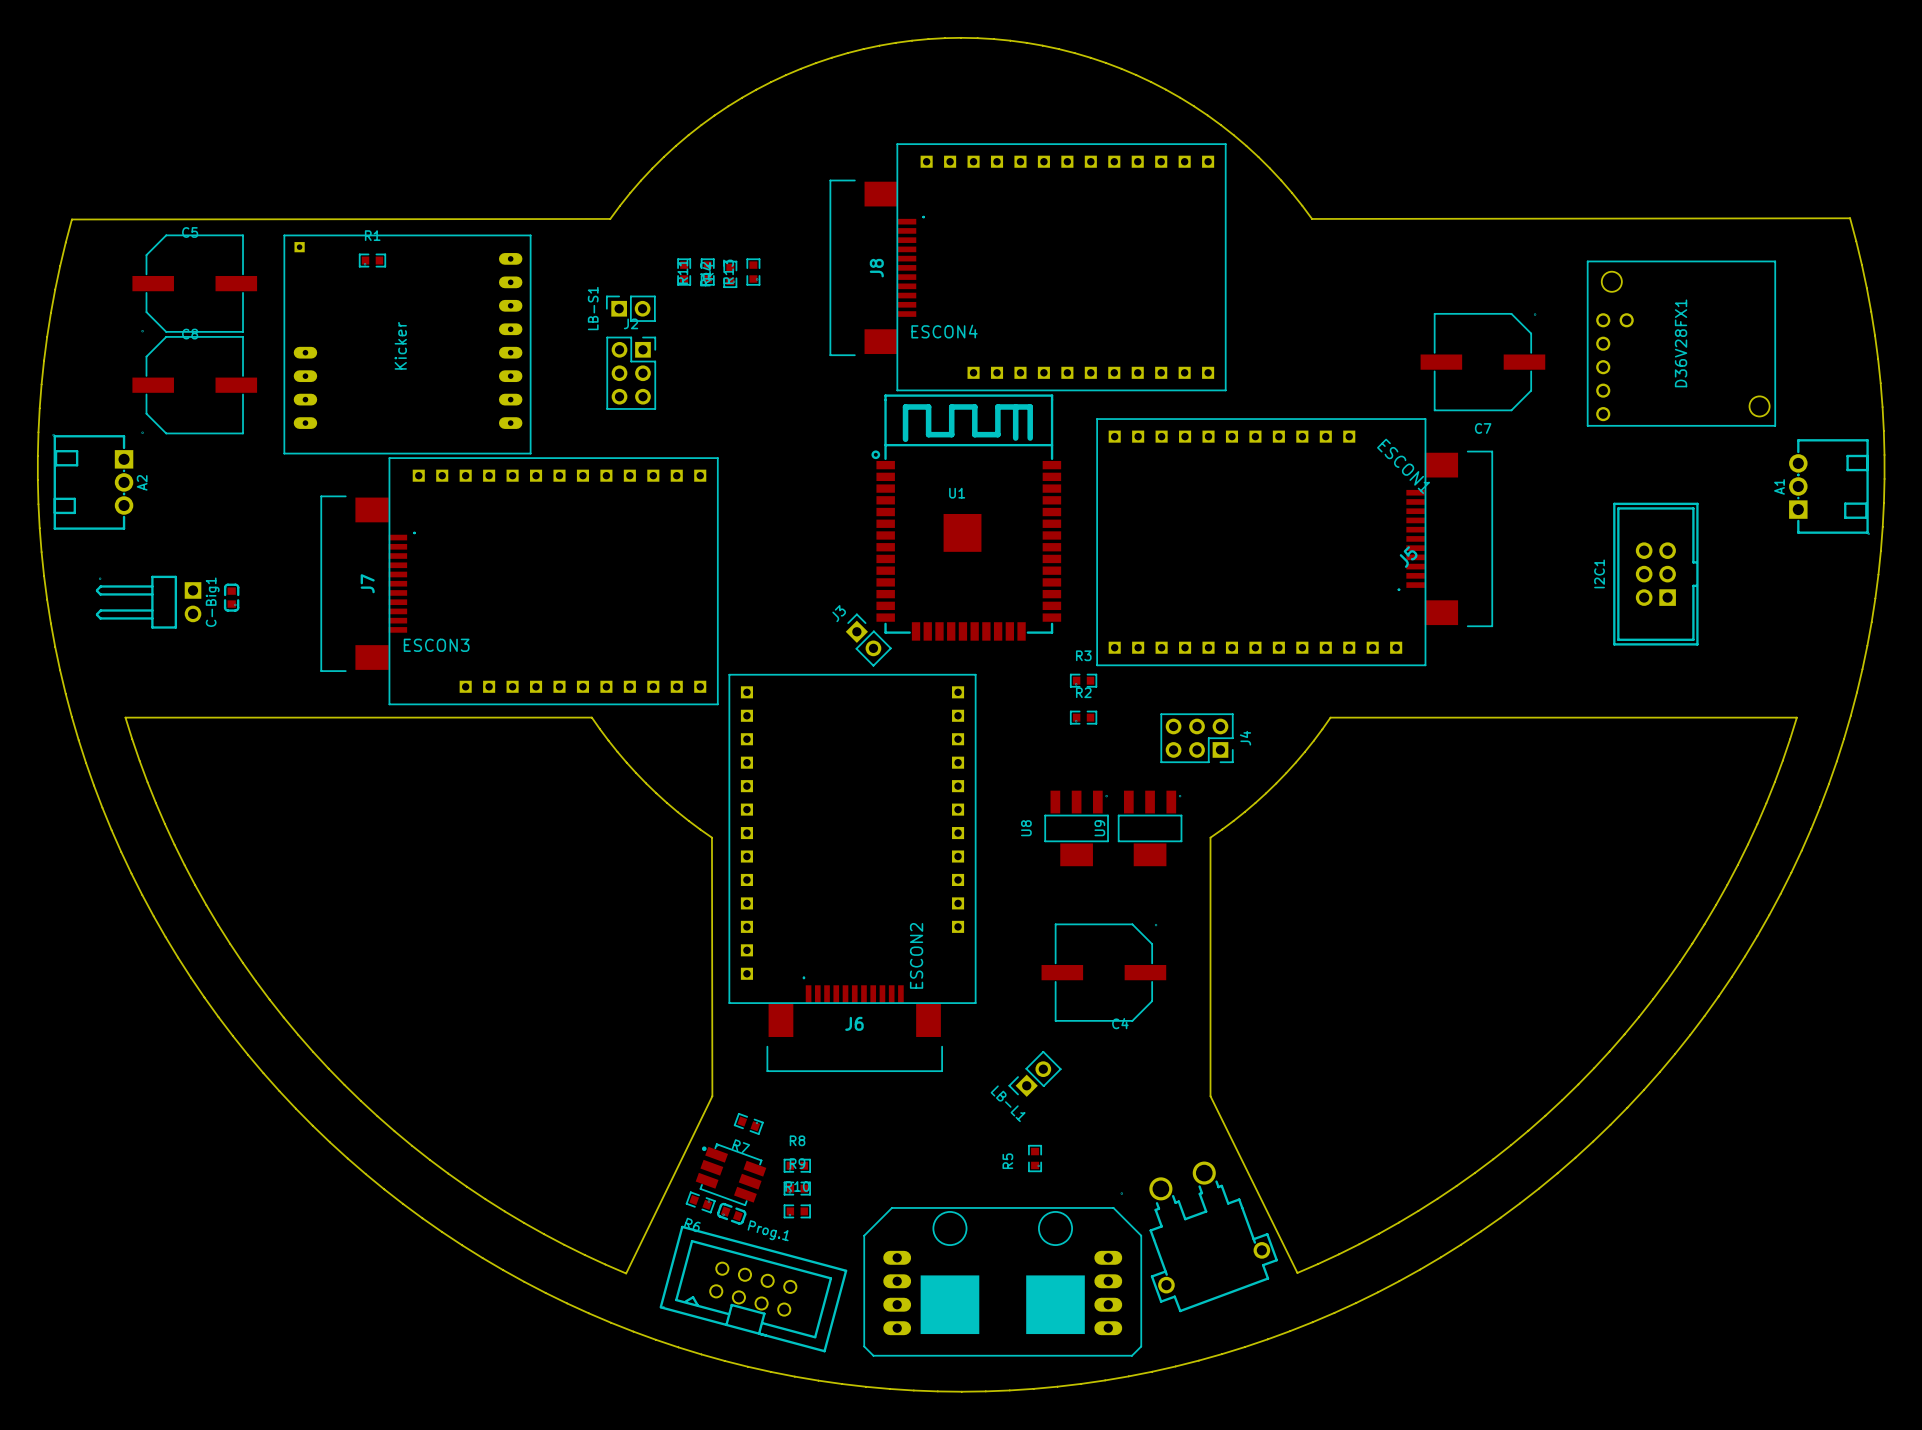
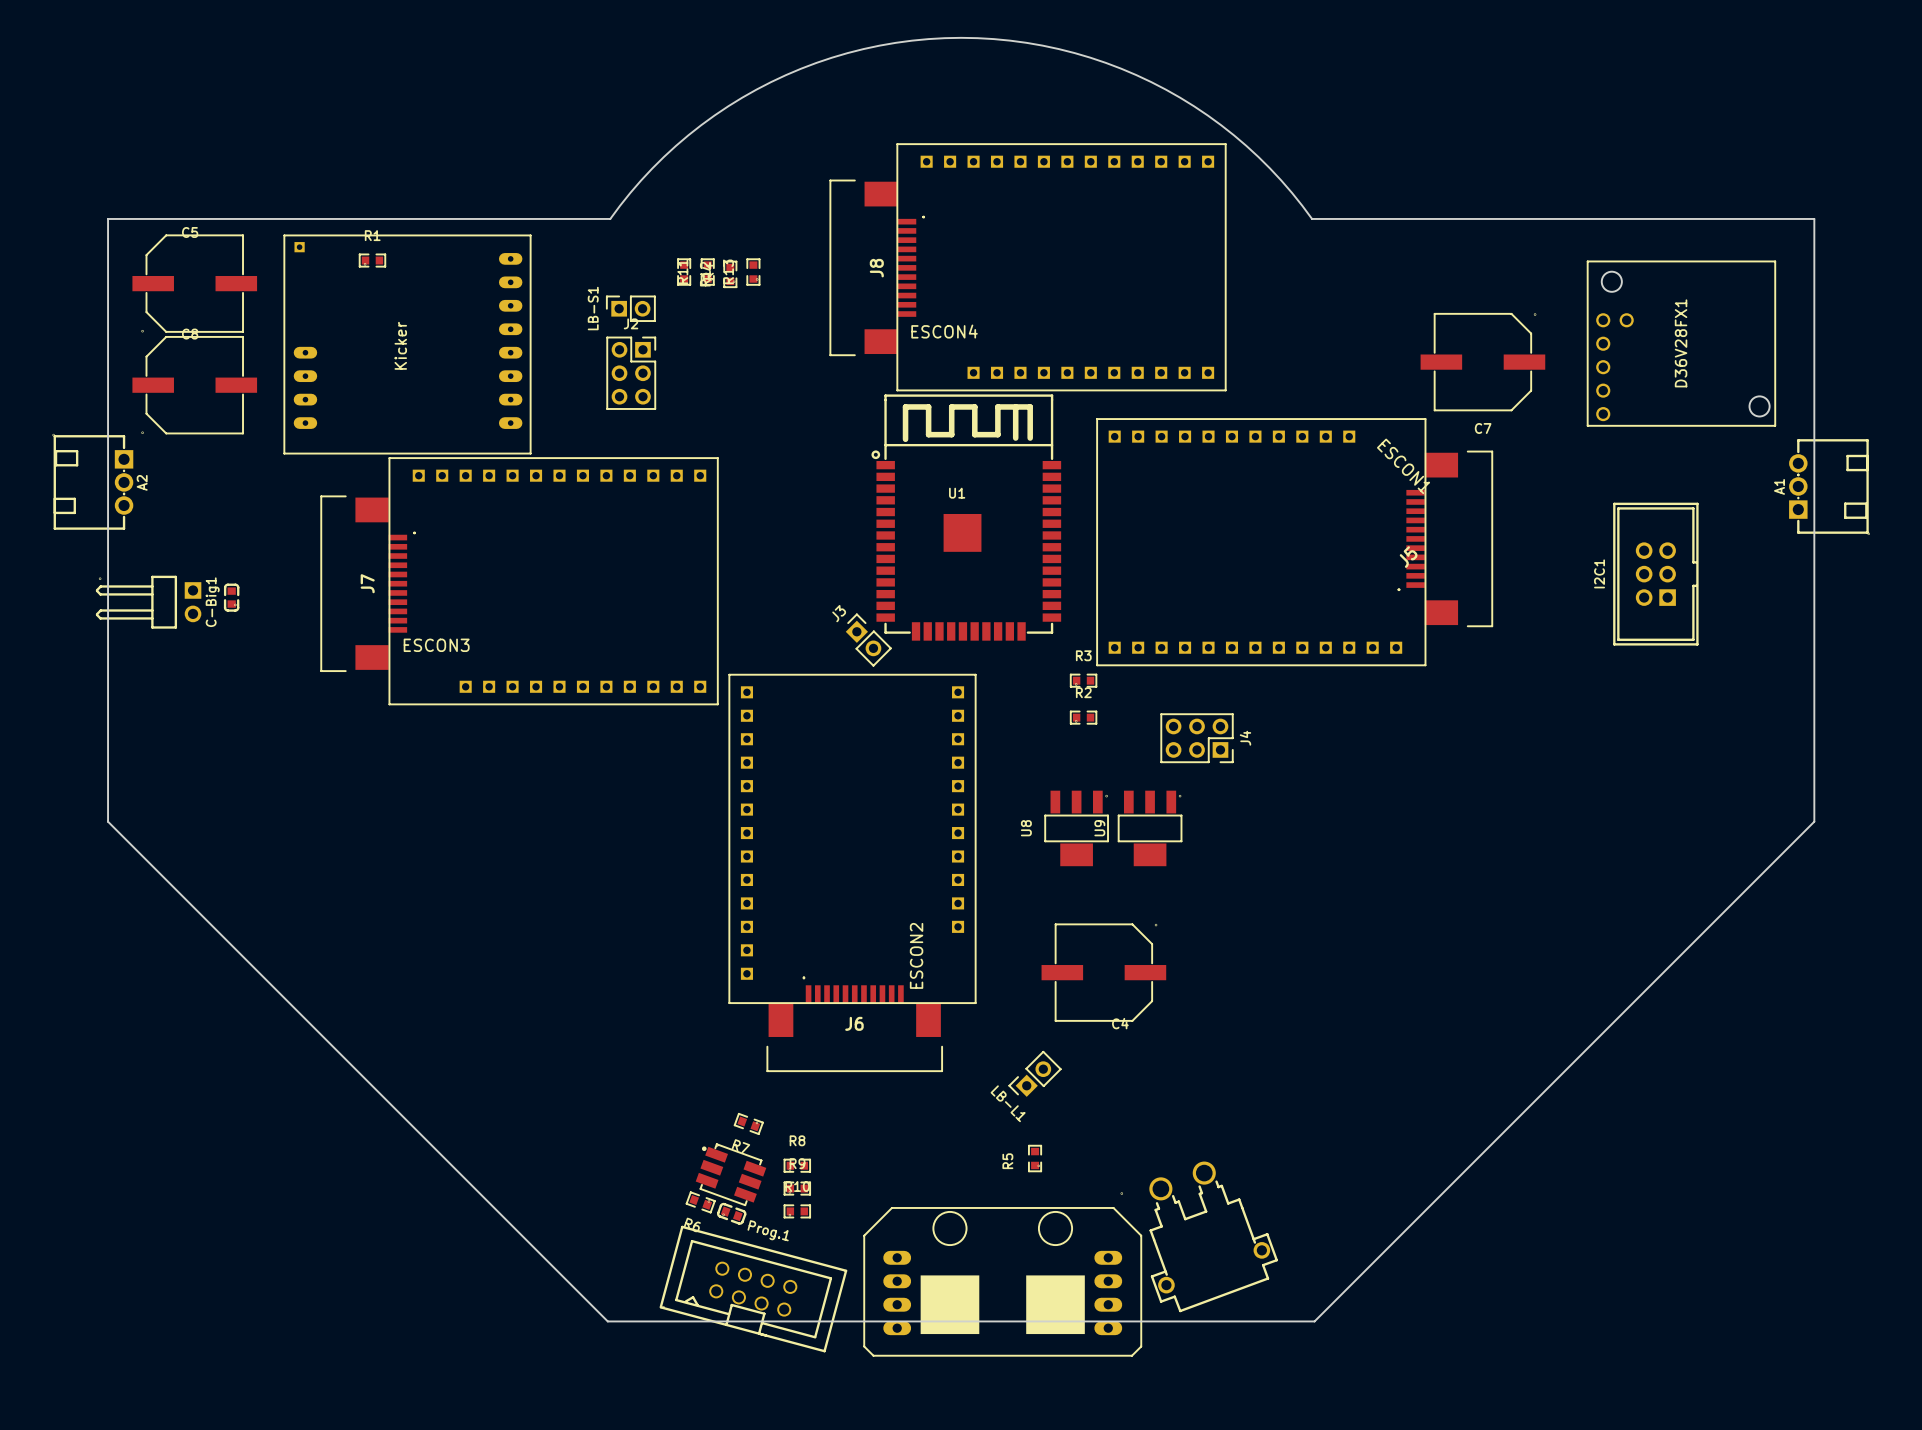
board edge: (961, 37) (1010, 40) (1074, 53) (1121, 68) (1165, 89) (1207, 115) (1246, 145) (1281, 180) (1312, 218) (1850, 218) (1866, 288) (1878, 359) (1883, 431) (1884, 478) (1878, 574) (1867, 645) (1844, 738) (1811, 828) (1780, 894) (1732, 976) (1675, 1053) (1610, 1124) (1538, 1188) (1461, 1244) (1399, 1281) (1312, 1322) (1222, 1354) (1128, 1376) (1033, 1388) (961, 1391) (866, 1386) (771, 1371) (701, 1354) (611, 1322) (545, 1292) (462, 1245) (384, 1189) (312, 1125) (263, 1073) (204, 997) (153, 916) (111, 830) (78, 740) (55, 647) (41, 552) (37, 480) (39, 408) (47, 336) (55, 289) (71, 219) (610, 218) (641, 180) (675, 145) (714, 115) (756, 89) (801, 68) (863, 49) (912, 40) (961, 37) -> (108, 218) (108, 821) (607, 1321) (1314, 1321) (1814, 821) (1814, 218) (1312, 218) (1281, 180) (1246, 145) (1194, 106) (1151, 82) (1105, 62) (1058, 49) (1010, 40) (961, 37) (912, 40) (847, 53) (801, 68) (756, 89) (714, 115) (675, 145) (641, 180) (610, 218) (108, 218)
board edge: (125, 717) (155, 803) (195, 885) (242, 962) (269, 999) (313, 1051) (344, 1084) (394, 1131) (466, 1186) (544, 1234) (626, 1273) (712, 1096) (711, 837) (677, 812) (646, 783) (617, 751) (591, 717) (125, 717) -> none
board edge: (1330, 717) (1305, 751) (1276, 783) (1244, 812) (1210, 837) (1210, 1096) (1297, 1272) (1379, 1233) (1437, 1198) (1475, 1172) (1545, 1115) (1609, 1051) (1666, 980) (1716, 904) (1757, 823) (1774, 782) (1796, 717) (1330, 717) -> none

